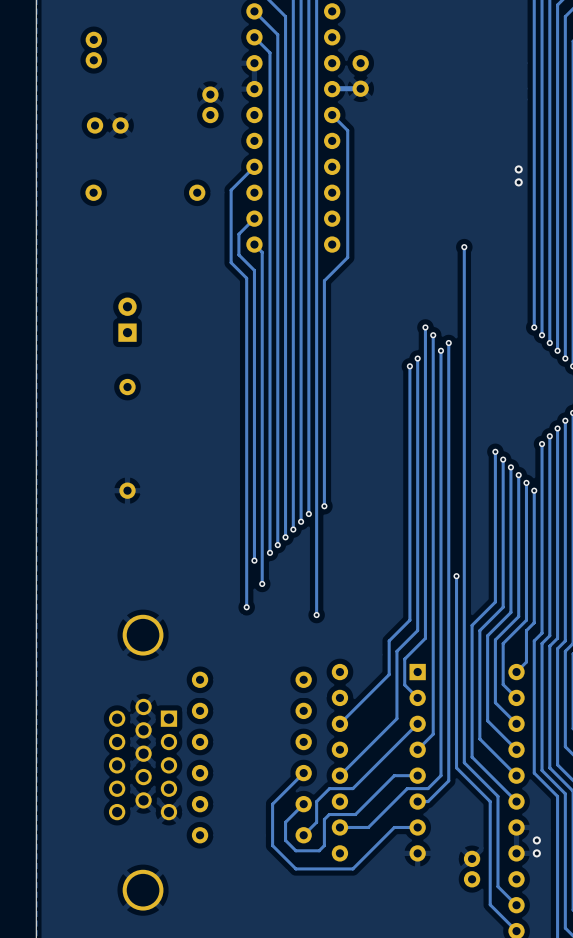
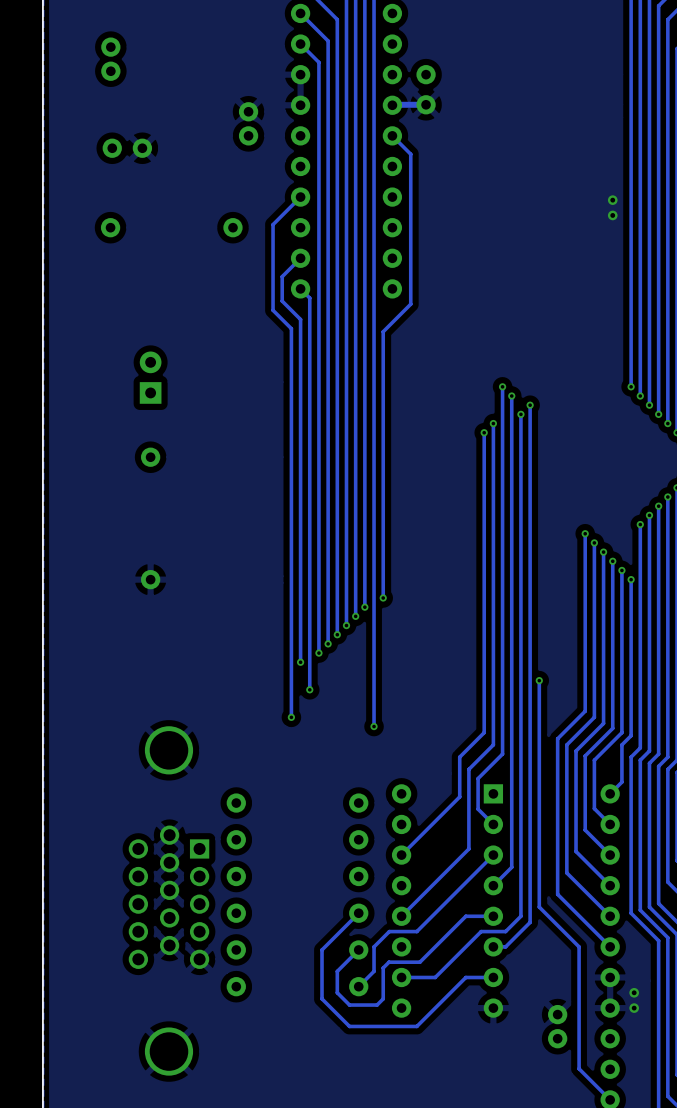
track: (464, 247) (464, 762) (497, 796) (497, 886) (516, 905) -> none
via: (464, 247) -> none

